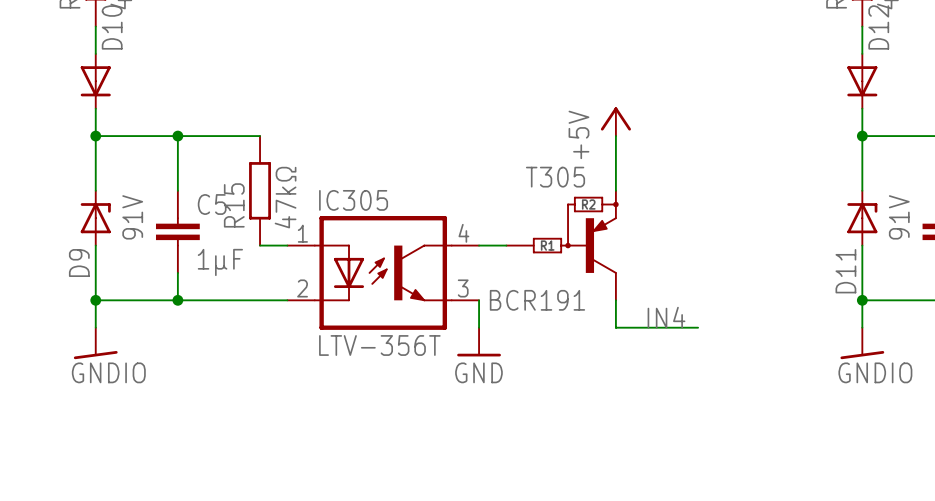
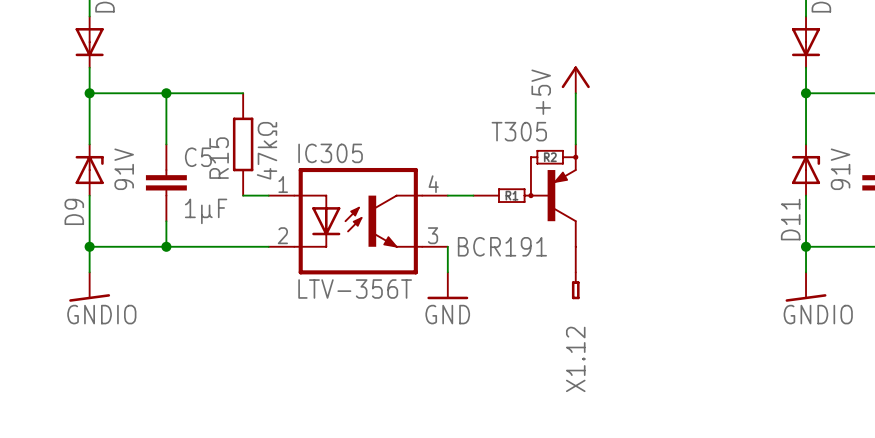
wire: (615, 300) (615, 327) (698, 327) -> none
label: IN4 (666, 317) -> none
X1.12: none -> (575, 273)

